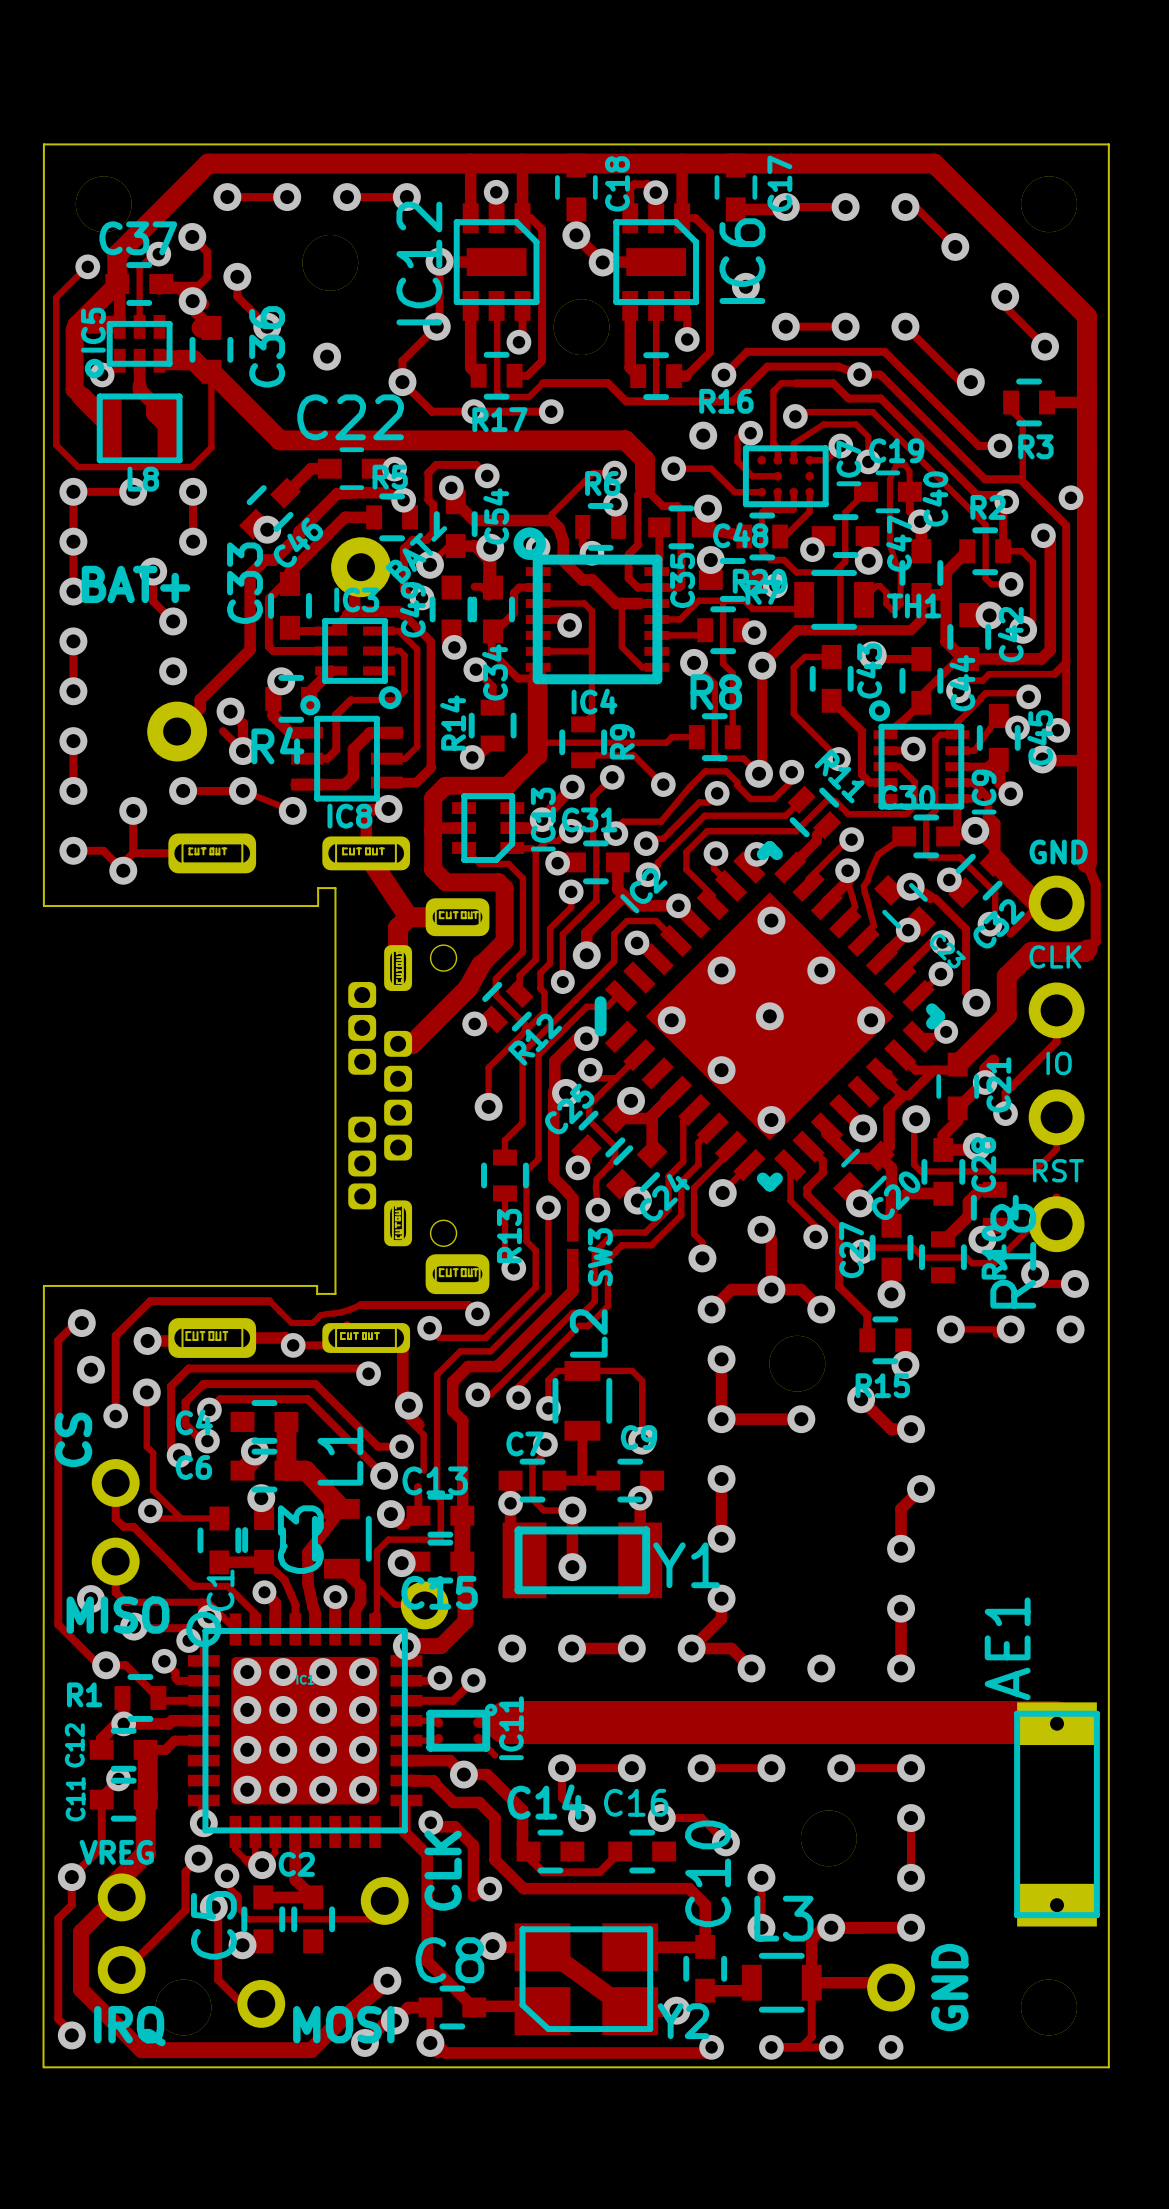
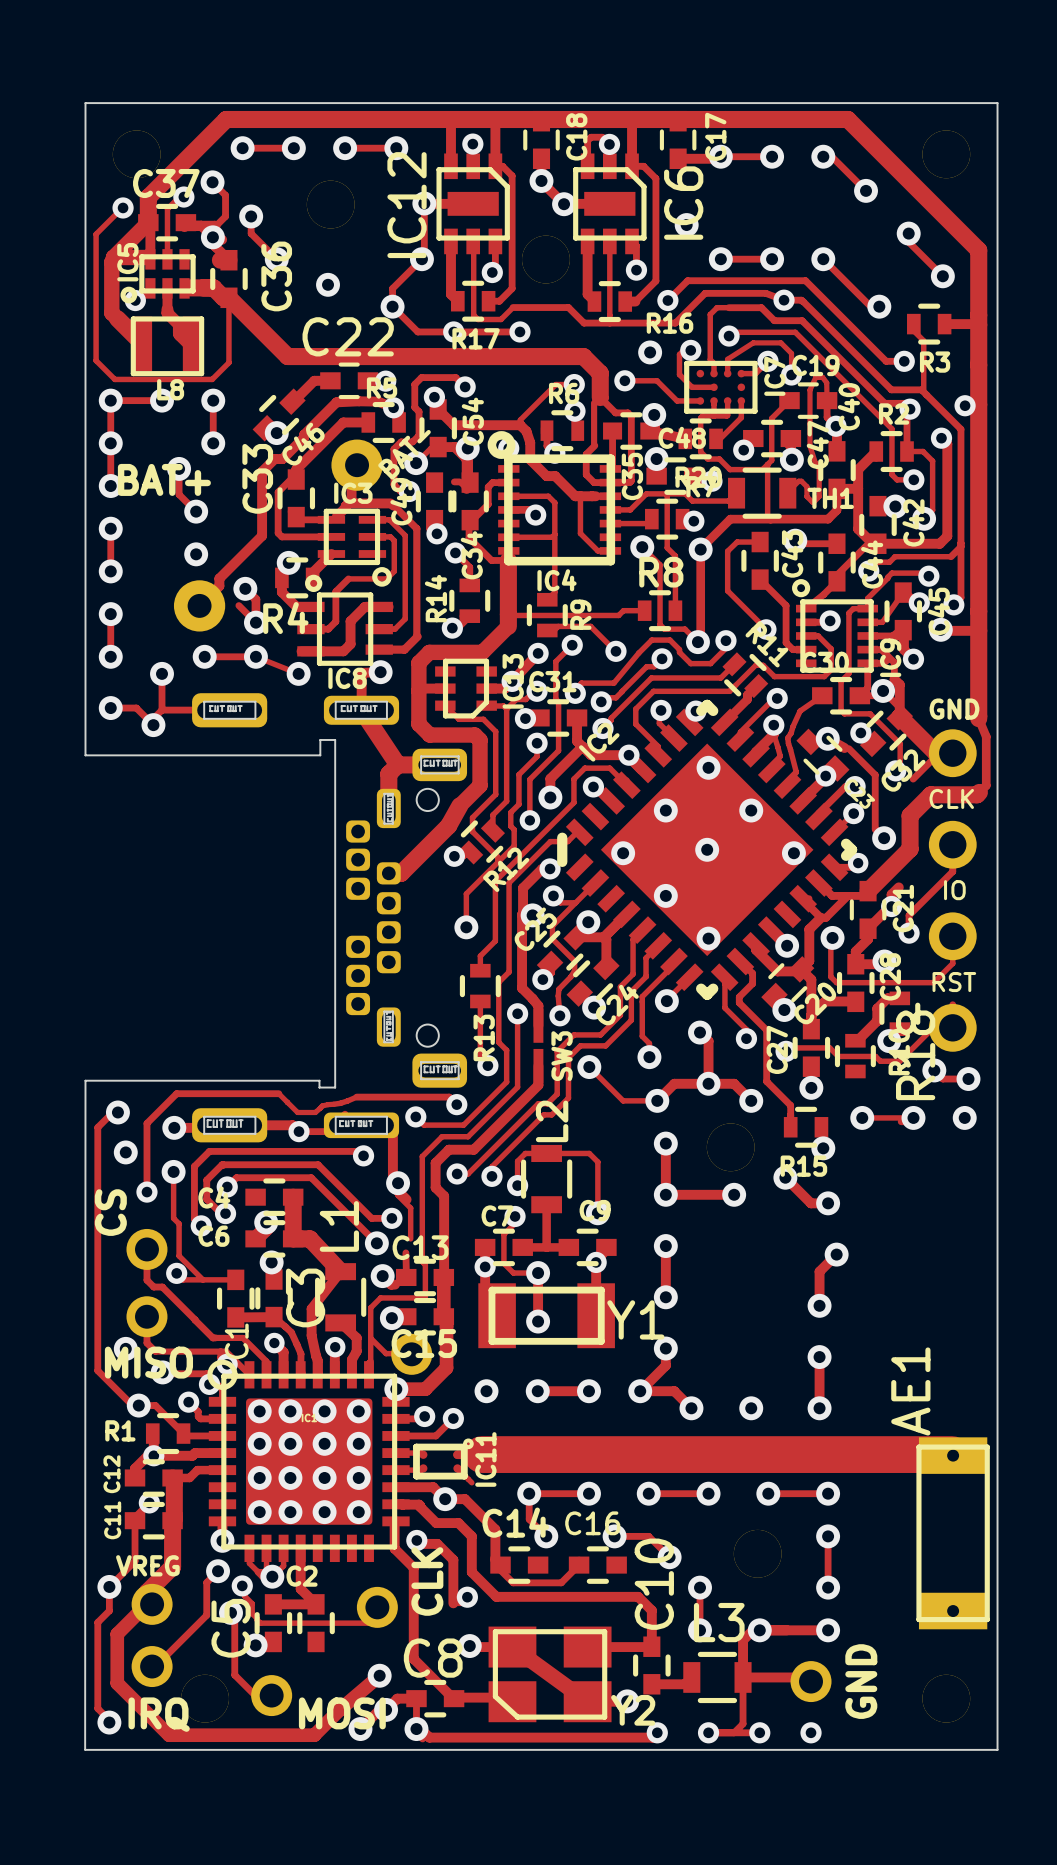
track: none -> (589, 1067) (623, 1100) (657, 1100)
via: none -> (589, 1067)

